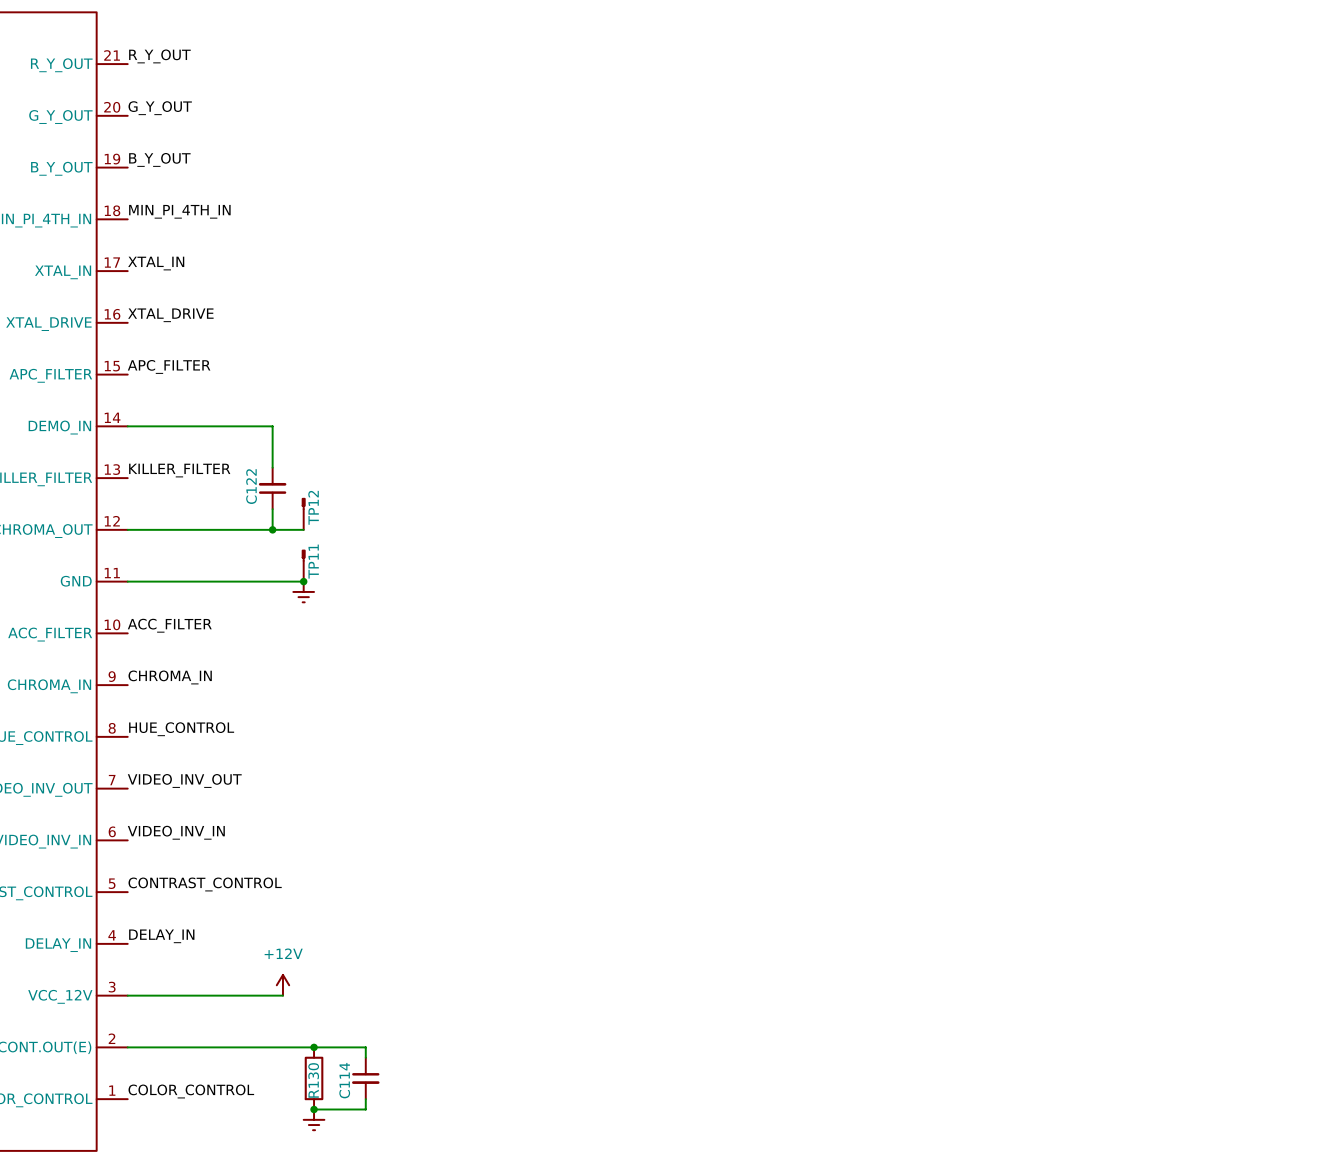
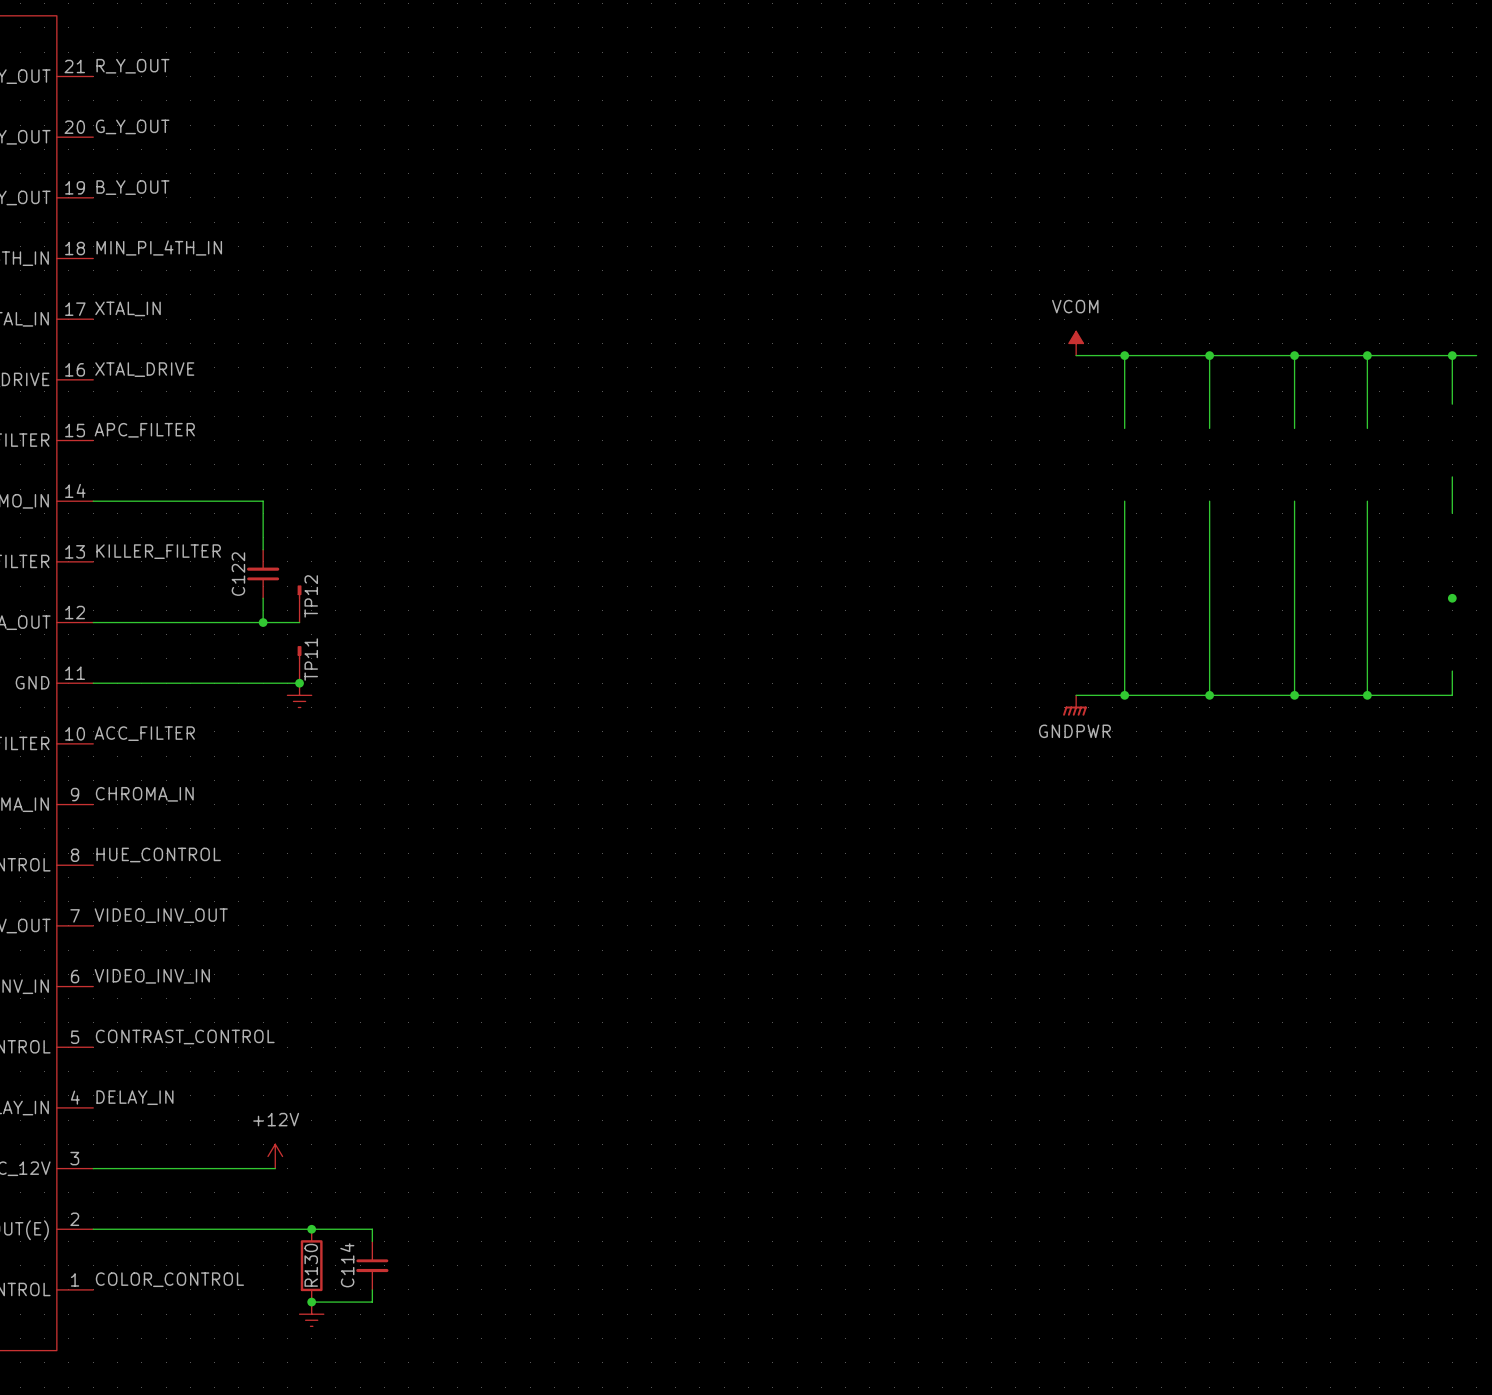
power symbol: none -> VCOM (1076, 343)
wire: none -> (1076, 355) (1476, 355)
wire: none -> (1124, 355) (1124, 428)
junction: none -> (1124, 355)
wire: none -> (1209, 355) (1209, 428)
junction: none -> (1209, 355)
wire: none -> (1294, 355) (1294, 428)
junction: none -> (1294, 355)
wire: none -> (1367, 355) (1367, 428)
junction: none -> (1367, 355)
wire: none -> (1452, 355) (1452, 404)
junction: none -> (1452, 355)
wire: none -> (1452, 476) (1452, 513)
wire: none -> (1124, 501) (1124, 695)
wire: none -> (1209, 501) (1209, 695)
wire: none -> (1294, 501) (1294, 695)
wire: none -> (1367, 501) (1367, 695)
junction: none -> (1452, 598)
wire: none -> (1452, 671) (1452, 695) (1076, 695)
junction: none -> (1124, 695)
junction: none -> (1209, 695)
junction: none -> (1294, 695)
junction: none -> (1367, 695)
power symbol: none -> GNDPWR (1074, 705)

